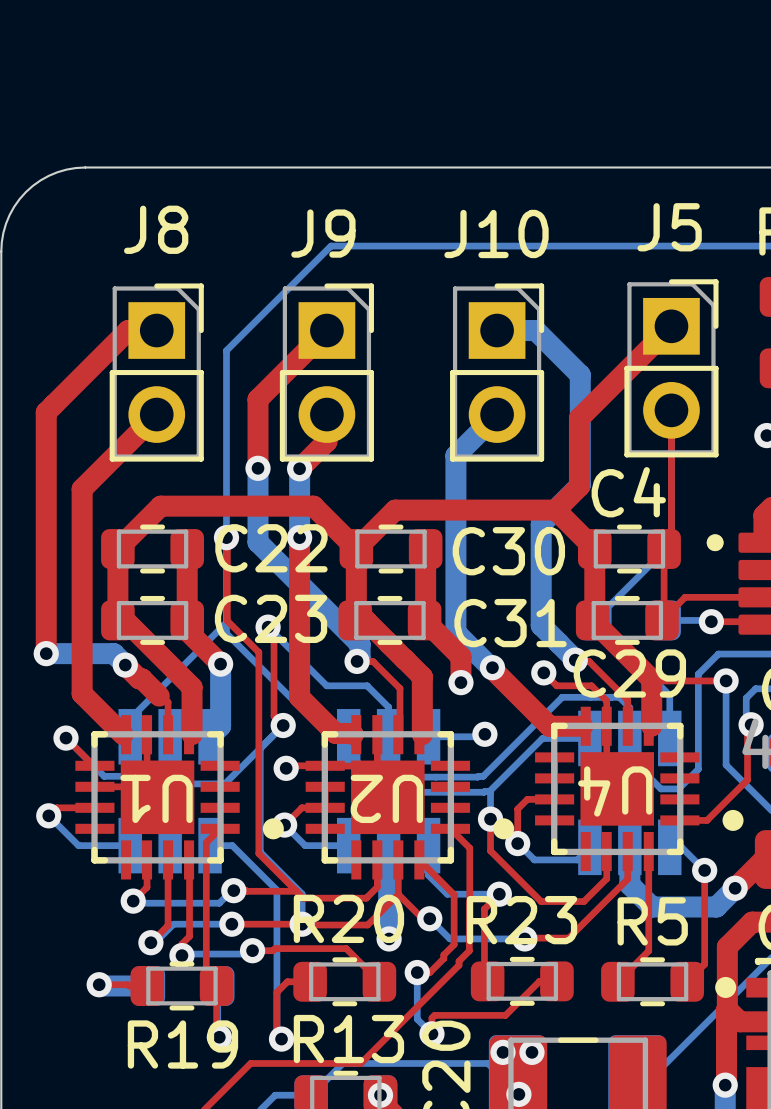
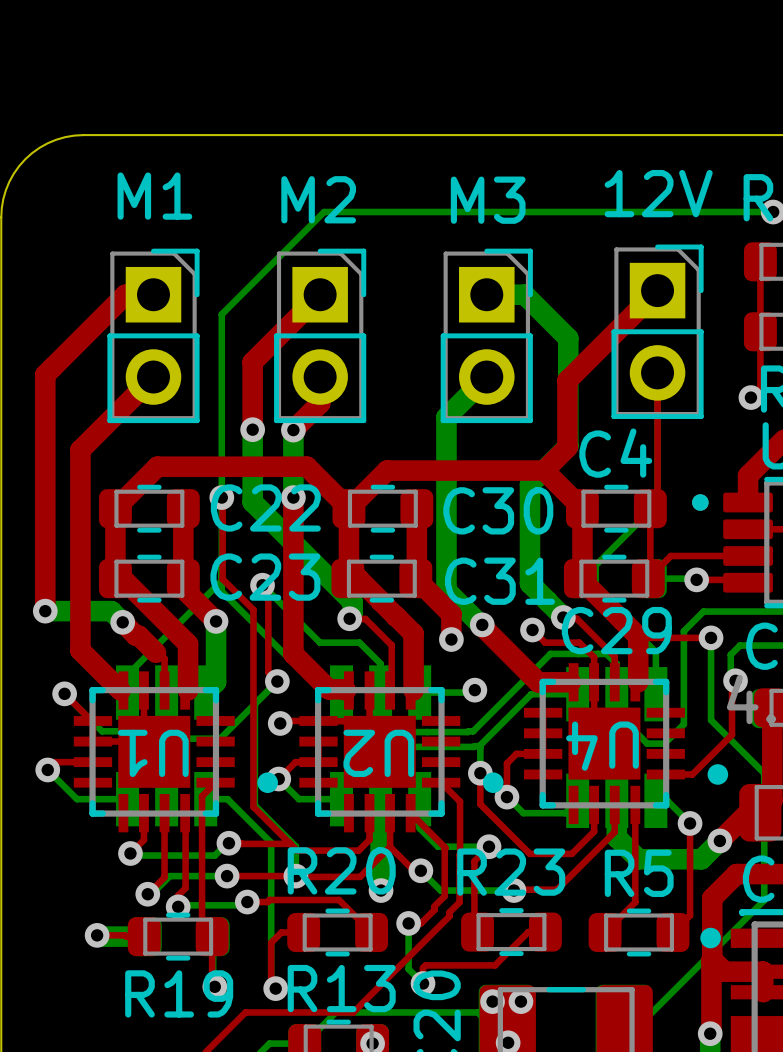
J5 name: J5 (669, 227) -> 12V (658, 193)
J8 name: J8 (156, 229) -> M1 (154, 196)
J9 name: J9 (323, 233) -> M2 (318, 199)
J10 name: J10 (496, 233) -> M3 (488, 200)

